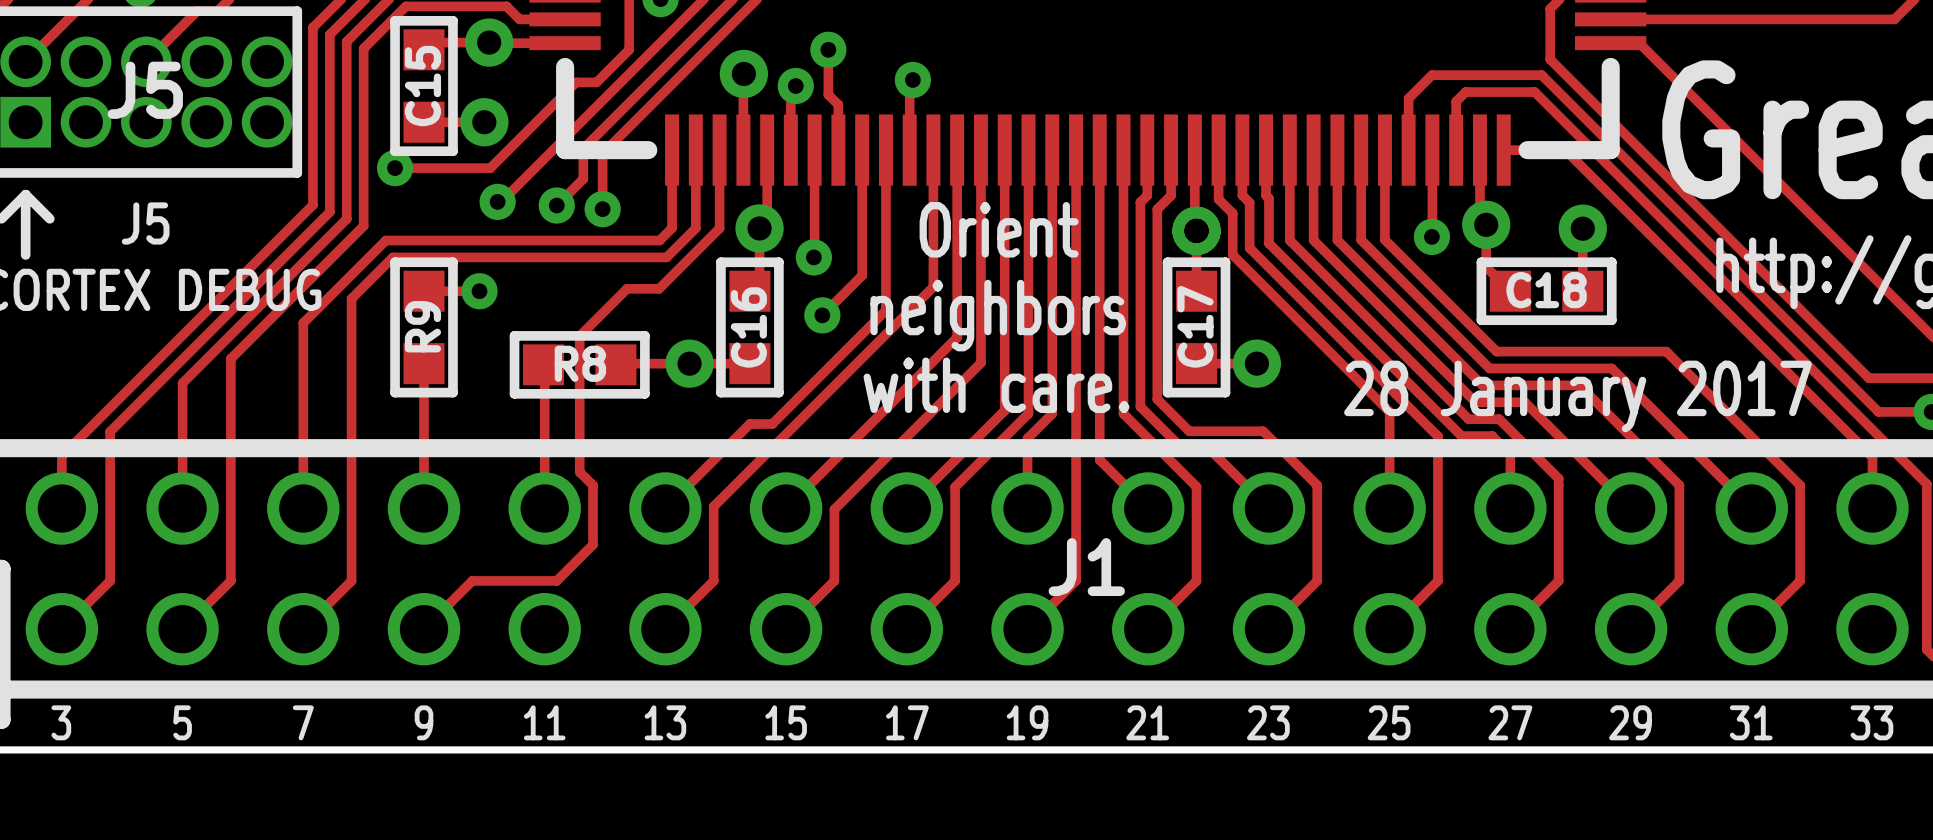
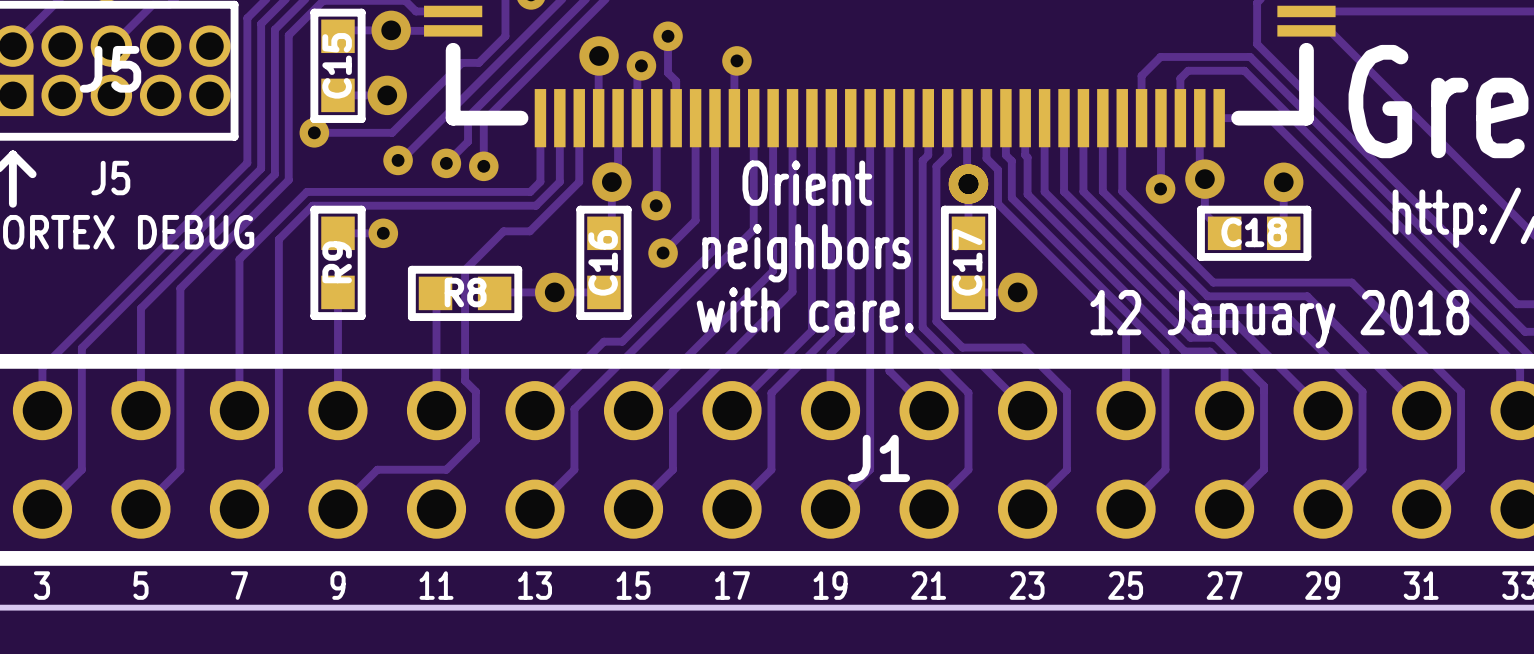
text: 28 January 2017 (1577, 396) -> 12 January 2018 (1279, 319)

